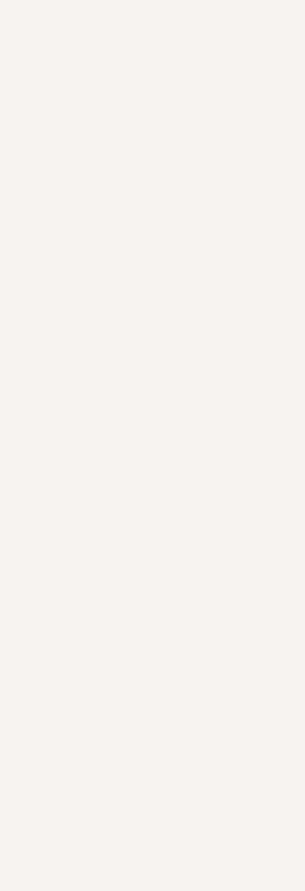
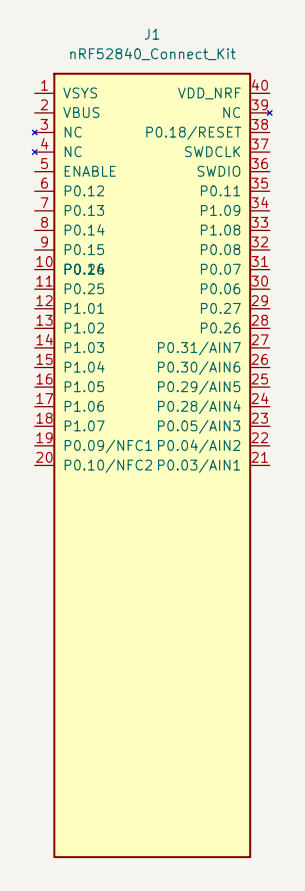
J1: none -> nRF52840_Connect_Kit (152, 465)

